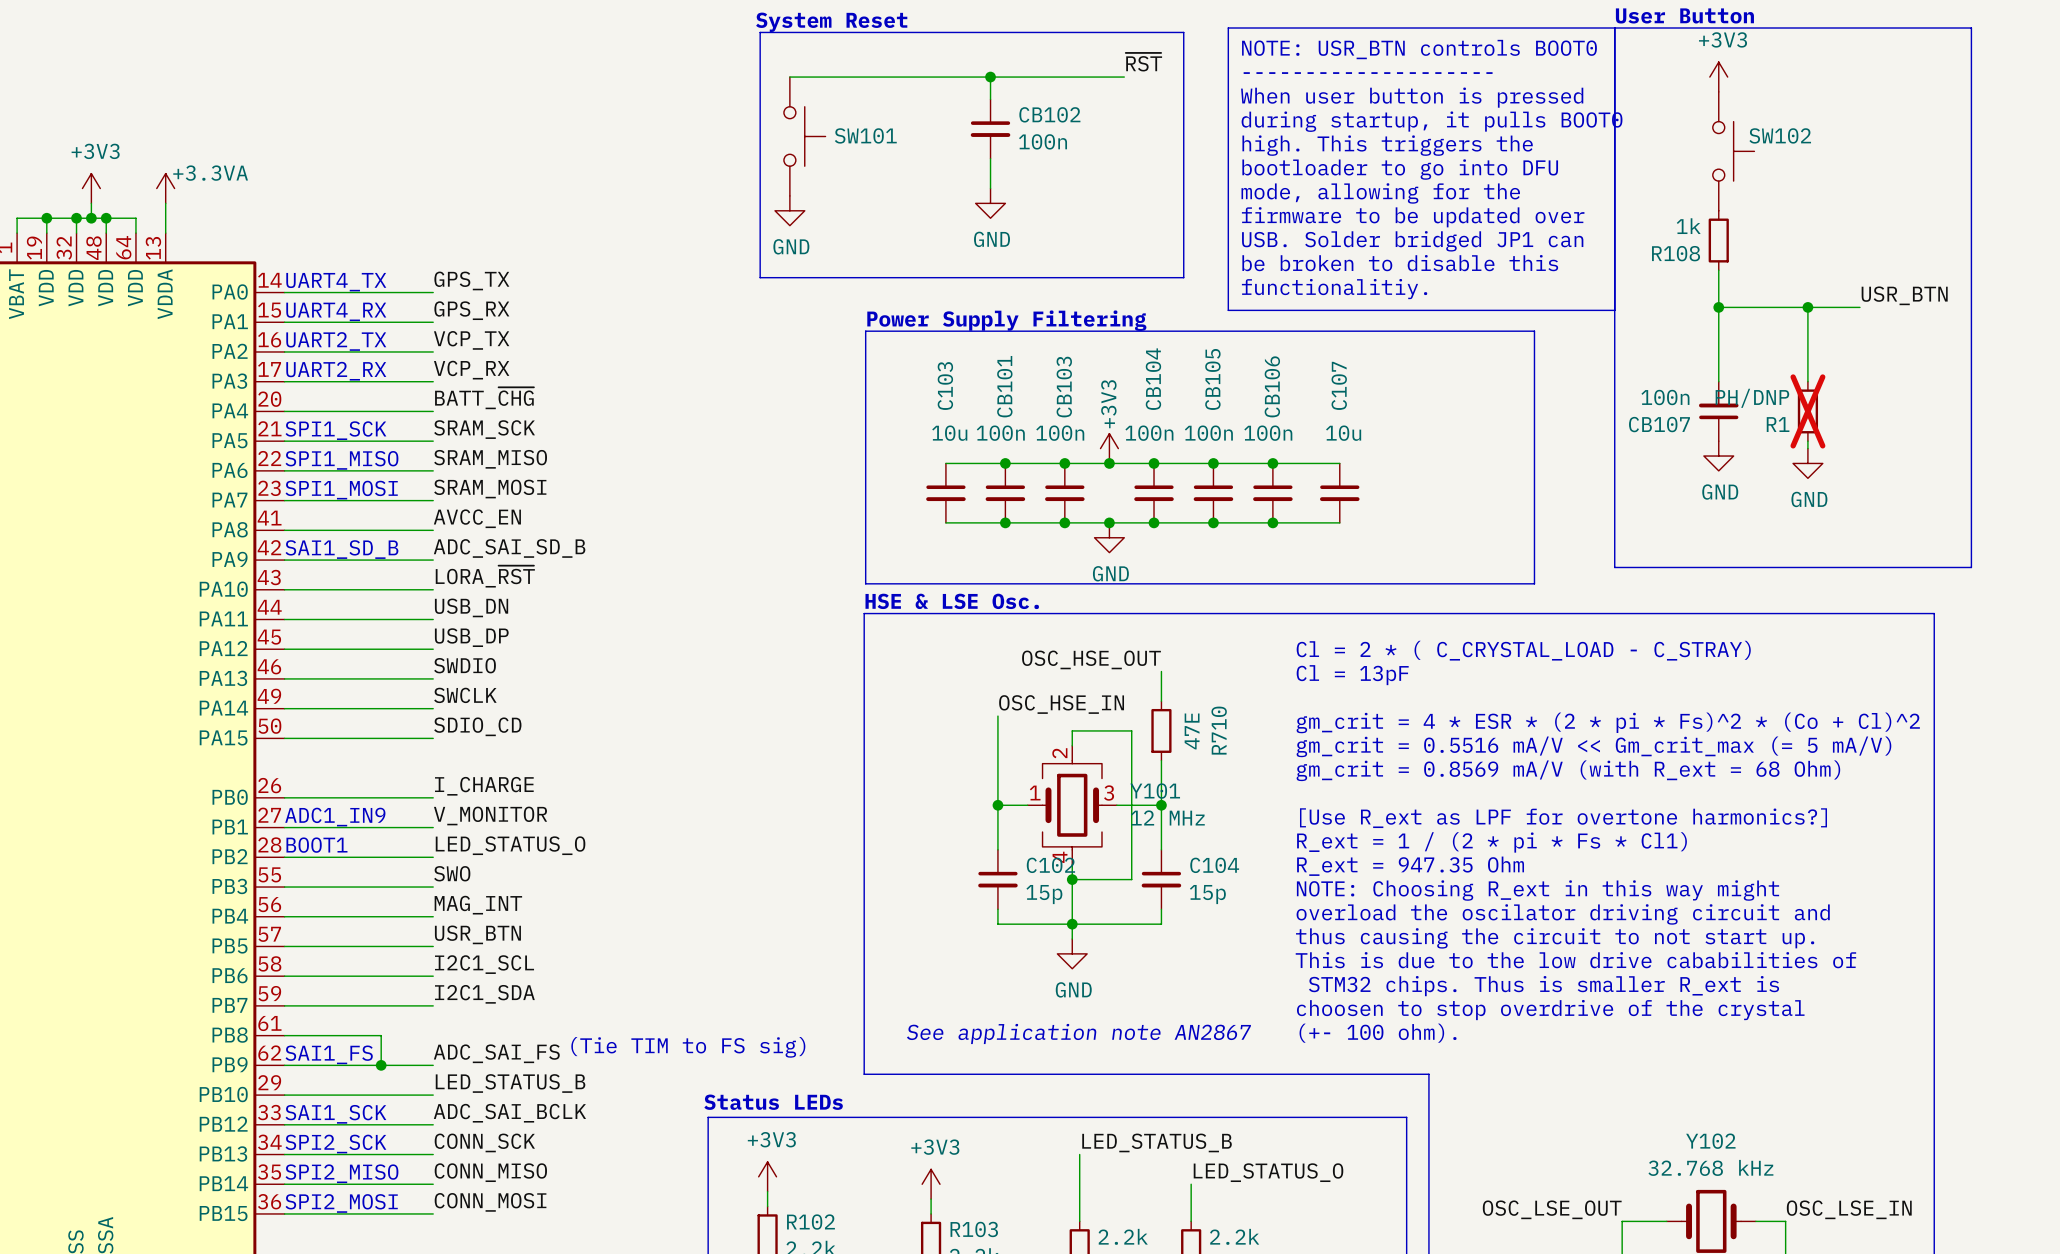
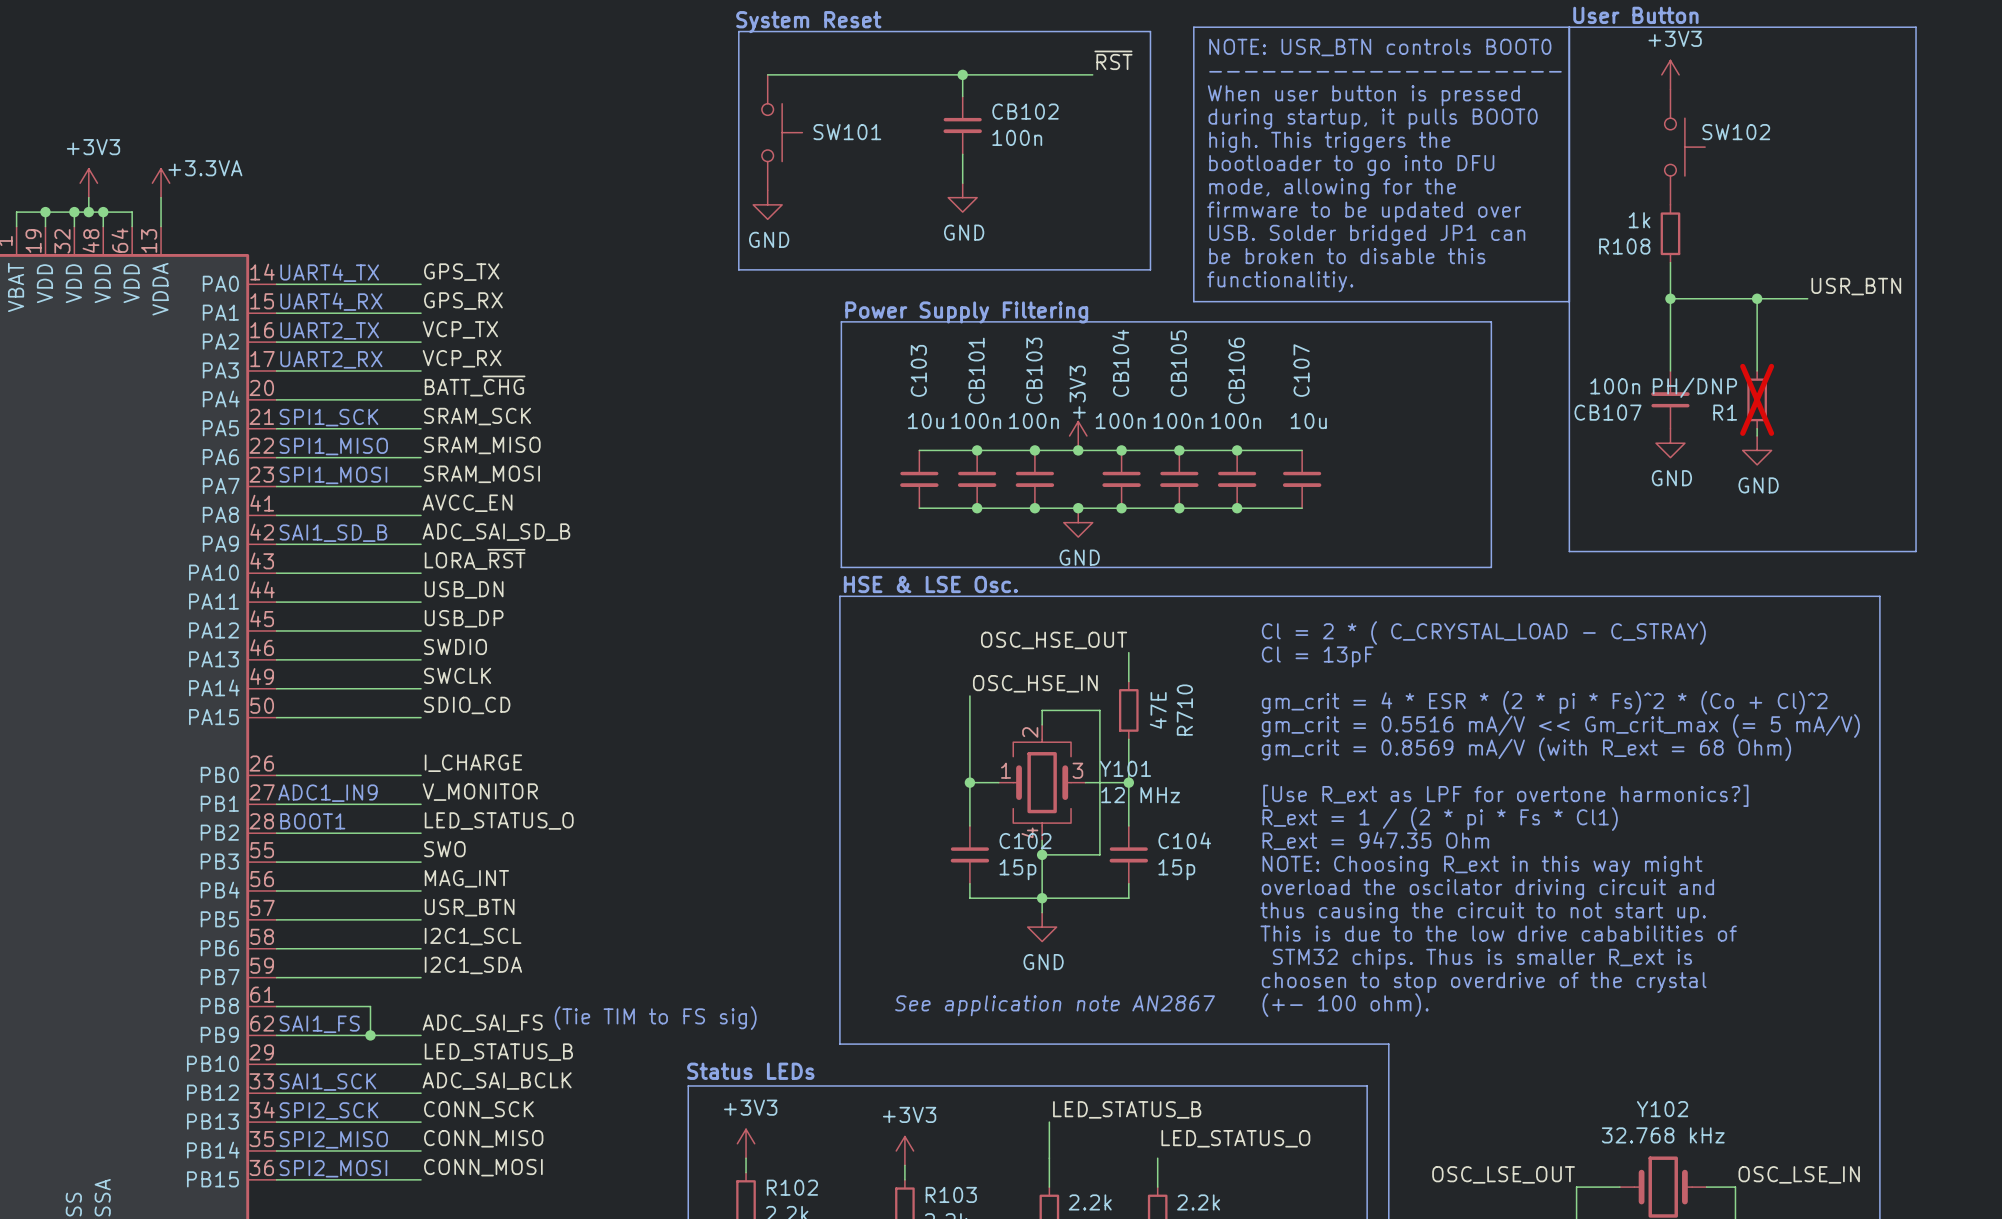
wire: (1191, 1184) (1191, 1191) -> none

